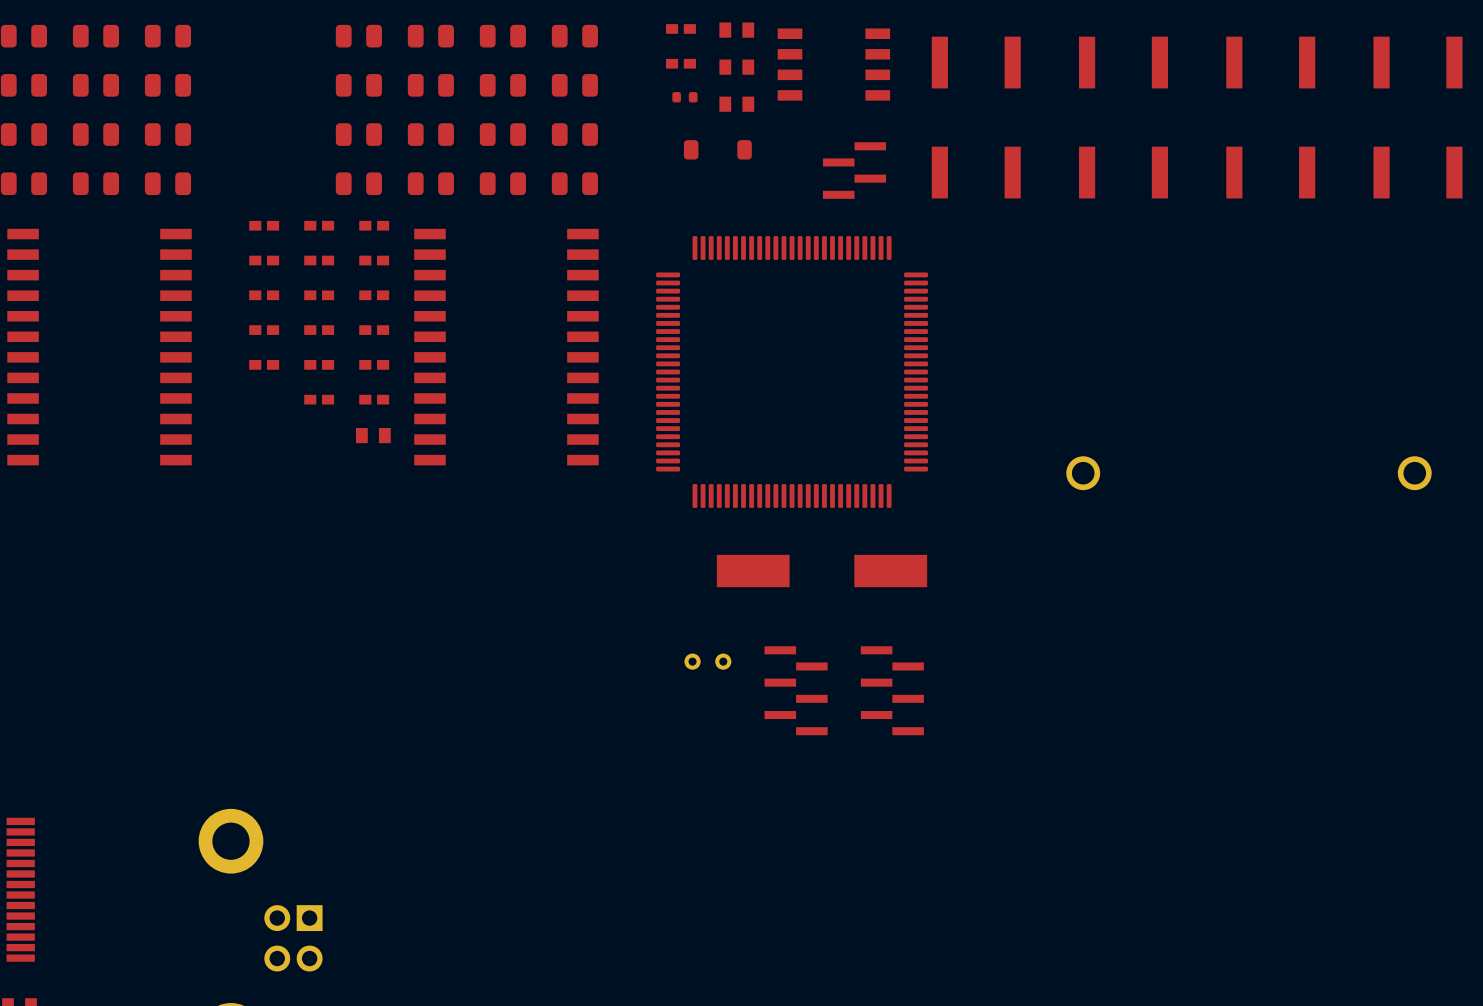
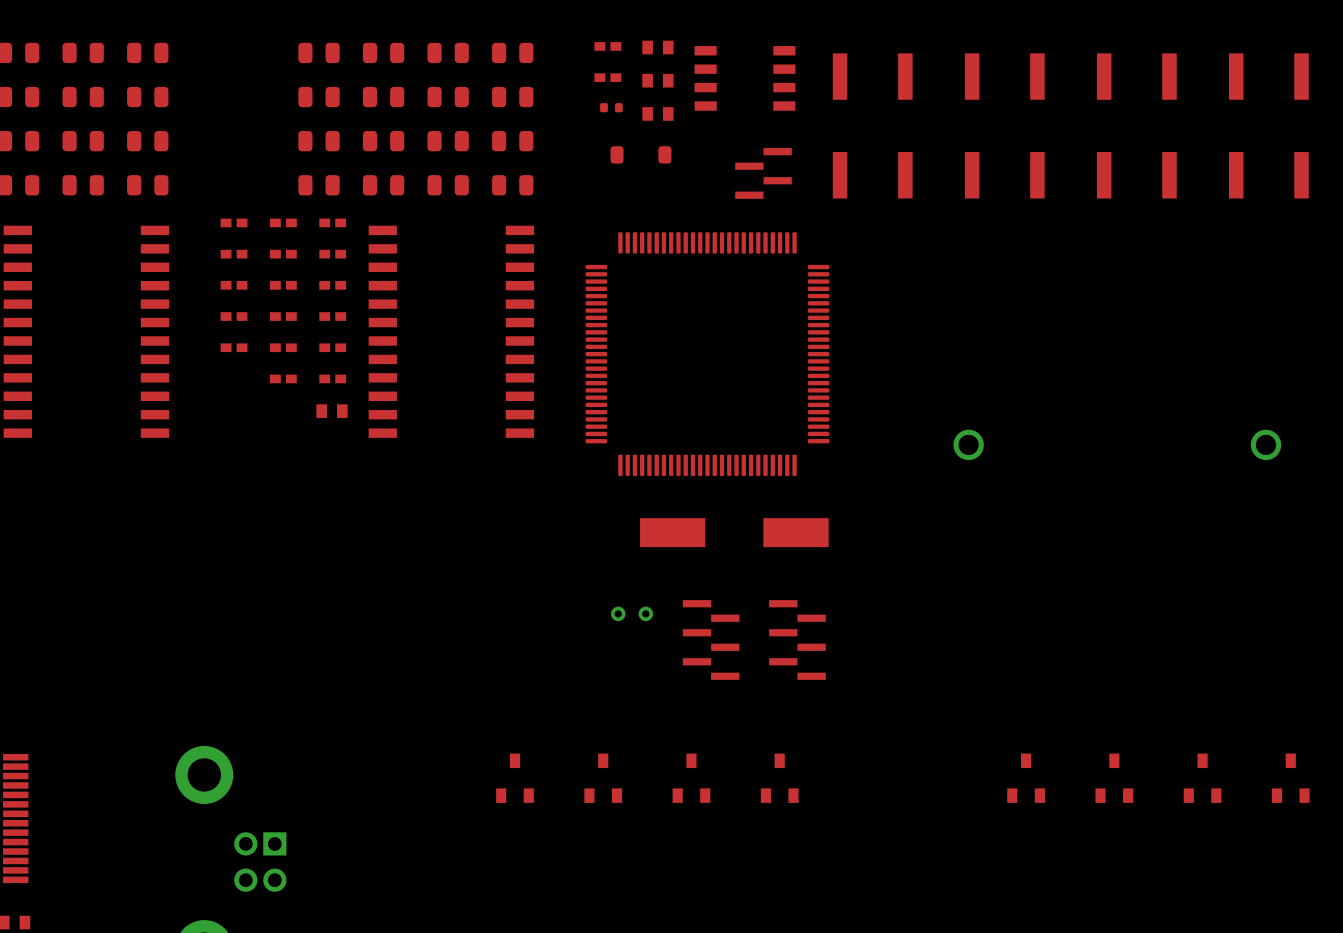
part: none -> (514, 778)
part: none -> (603, 778)
part: none -> (691, 778)
part: none -> (779, 778)
part: none -> (1026, 778)
part: none -> (1114, 778)
part: none -> (1202, 778)
part: none -> (1290, 778)

